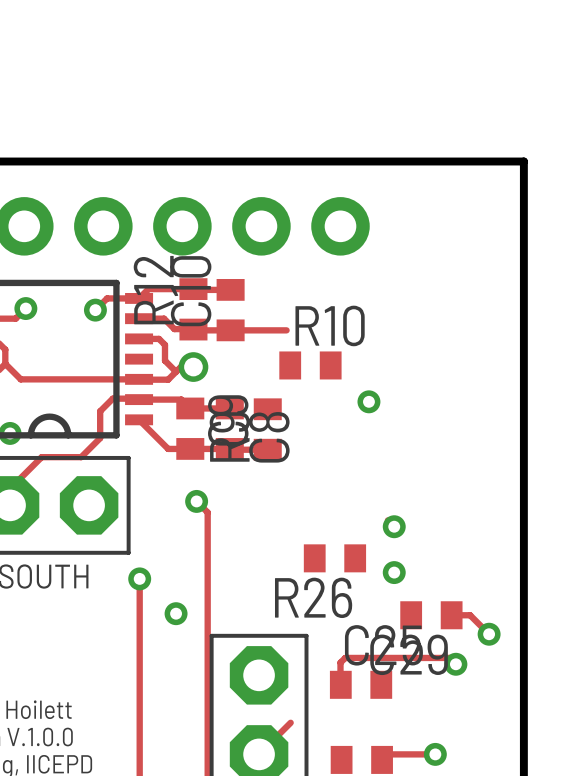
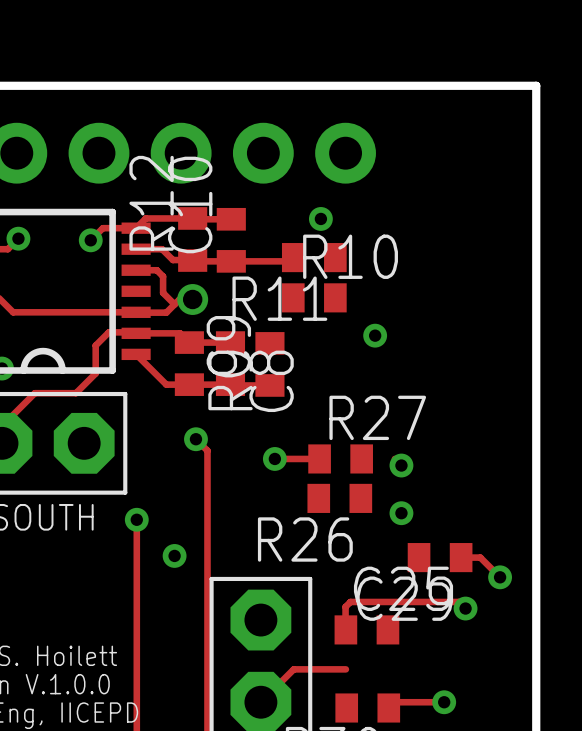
via: none -> (320, 218)
R11: none -> (314, 257)
track: none -> (274, 458) (319, 458)
via: none -> (274, 458)
R27: none -> (340, 458)
track: none -> (293, 669) (345, 669)

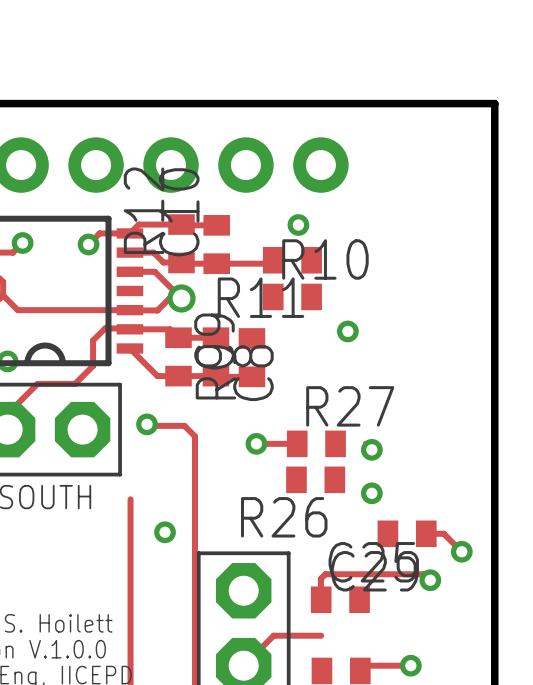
track: (156, 270) (163, 276) (163, 292) (174, 304) -> (148, 271) (154, 271) (181, 298)
track: none -> (147, 424) (184, 425)
via position: (195, 439) -> (147, 424)
via: (136, 519) -> none

